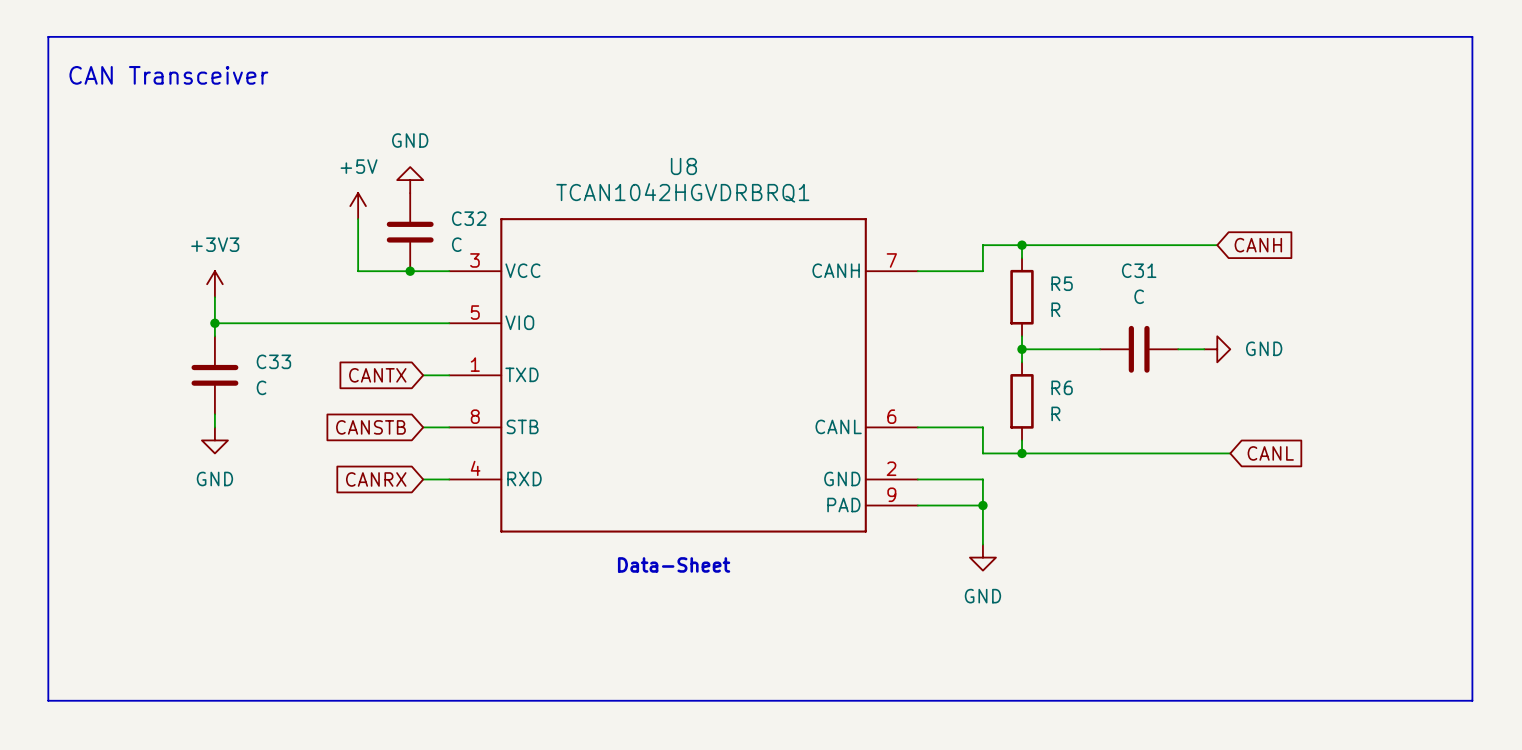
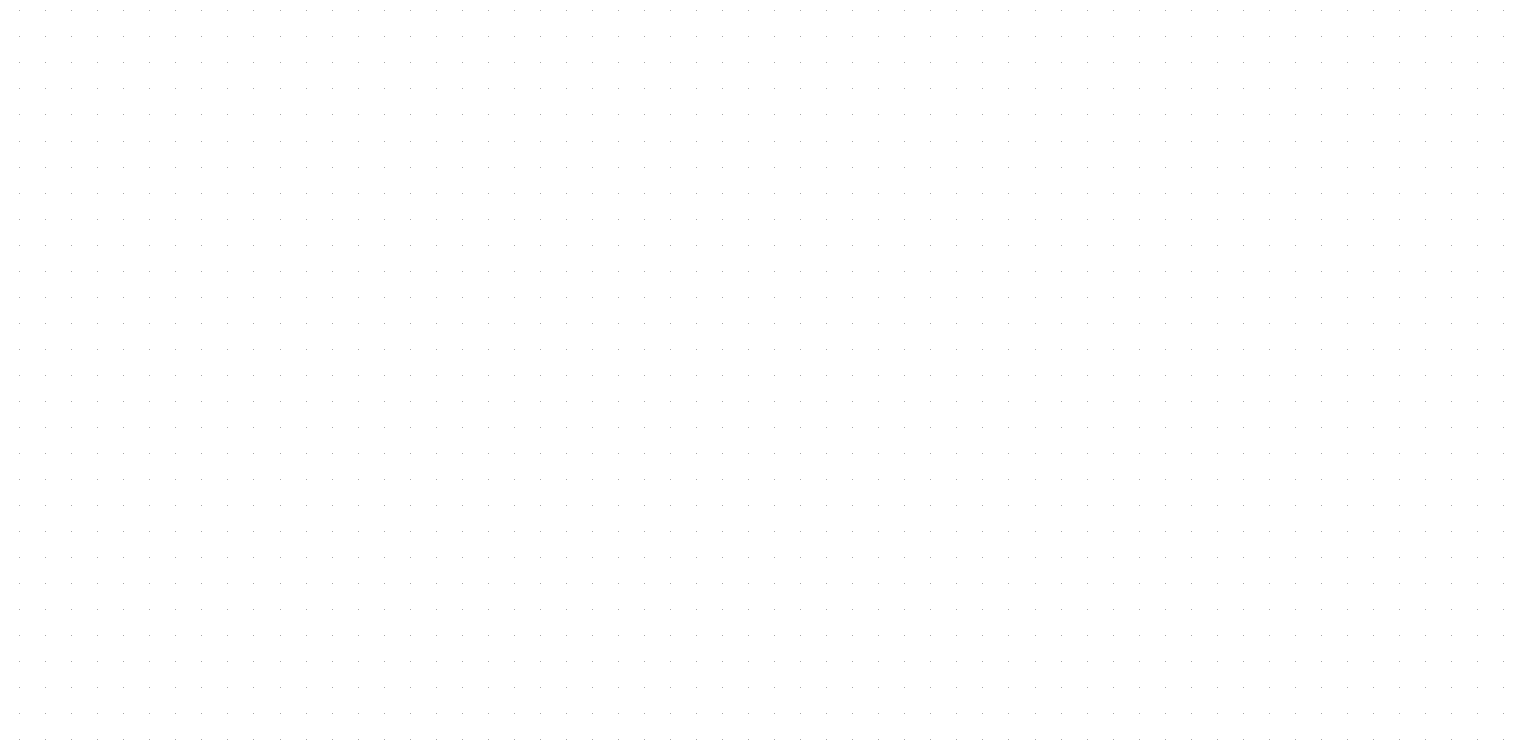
line: (48, 36) (1472, 36) (1472, 700) (48, 700) (48, 36) -> none
text: CAN Transceiver (168, 75) -> none
power symbol: GND (410, 180) -> none
power symbol: +5V (358, 206) -> none
wire: (358, 219) (358, 271) (449, 271) -> none
C32: C (410, 232) -> none
wire: (1022, 245) (1022, 258) -> none
junction: (1022, 245) -> none
wire: (1217, 245) (982, 245) (982, 271) (917, 271) -> none
global label: CANH (1258, 245) -> none
junction: (410, 271) -> none
power symbol: +3V3 (214, 284) -> none
wire: (214, 297) (214, 336) -> none
R5: R (1022, 297) -> none
wire: (214, 323) (449, 323) -> none
junction: (214, 323) -> none
wire: (1022, 336) (1022, 362) -> none
wire: (1022, 349) (1100, 349) -> none
junction: (1022, 349) -> none
C31: C (1139, 349) -> none
wire: (1178, 349) (1204, 349) -> none
power symbol: GND (1217, 349) -> none
C33: C (214, 375) -> none
global label: CANTX (377, 375) -> none
wire: (423, 375) (449, 375) -> none
U8: TCAN1042HGVDRBRQ1 (683, 375) -> none
R6: R (1022, 401) -> none
wire: (214, 414) (214, 427) -> none
global label: CANSTB (370, 427) -> none
wire: (423, 427) (449, 427) -> none
wire: (917, 427) (982, 427) (982, 453) (1230, 453) -> none
power symbol: GND (214, 440) -> none
wire: (1022, 440) (1022, 453) -> none
junction: (1022, 453) -> none
global label: CANL (1270, 453) -> none
global label: CANRX (376, 479) -> none
wire: (423, 479) (449, 479) -> none
wire: (917, 479) (982, 479) (982, 544) -> none
wire: (917, 505) (982, 505) -> none
junction: (982, 505) -> none
power symbol: GND (982, 557) -> none
text: Data-Sheet (674, 564) -> none

